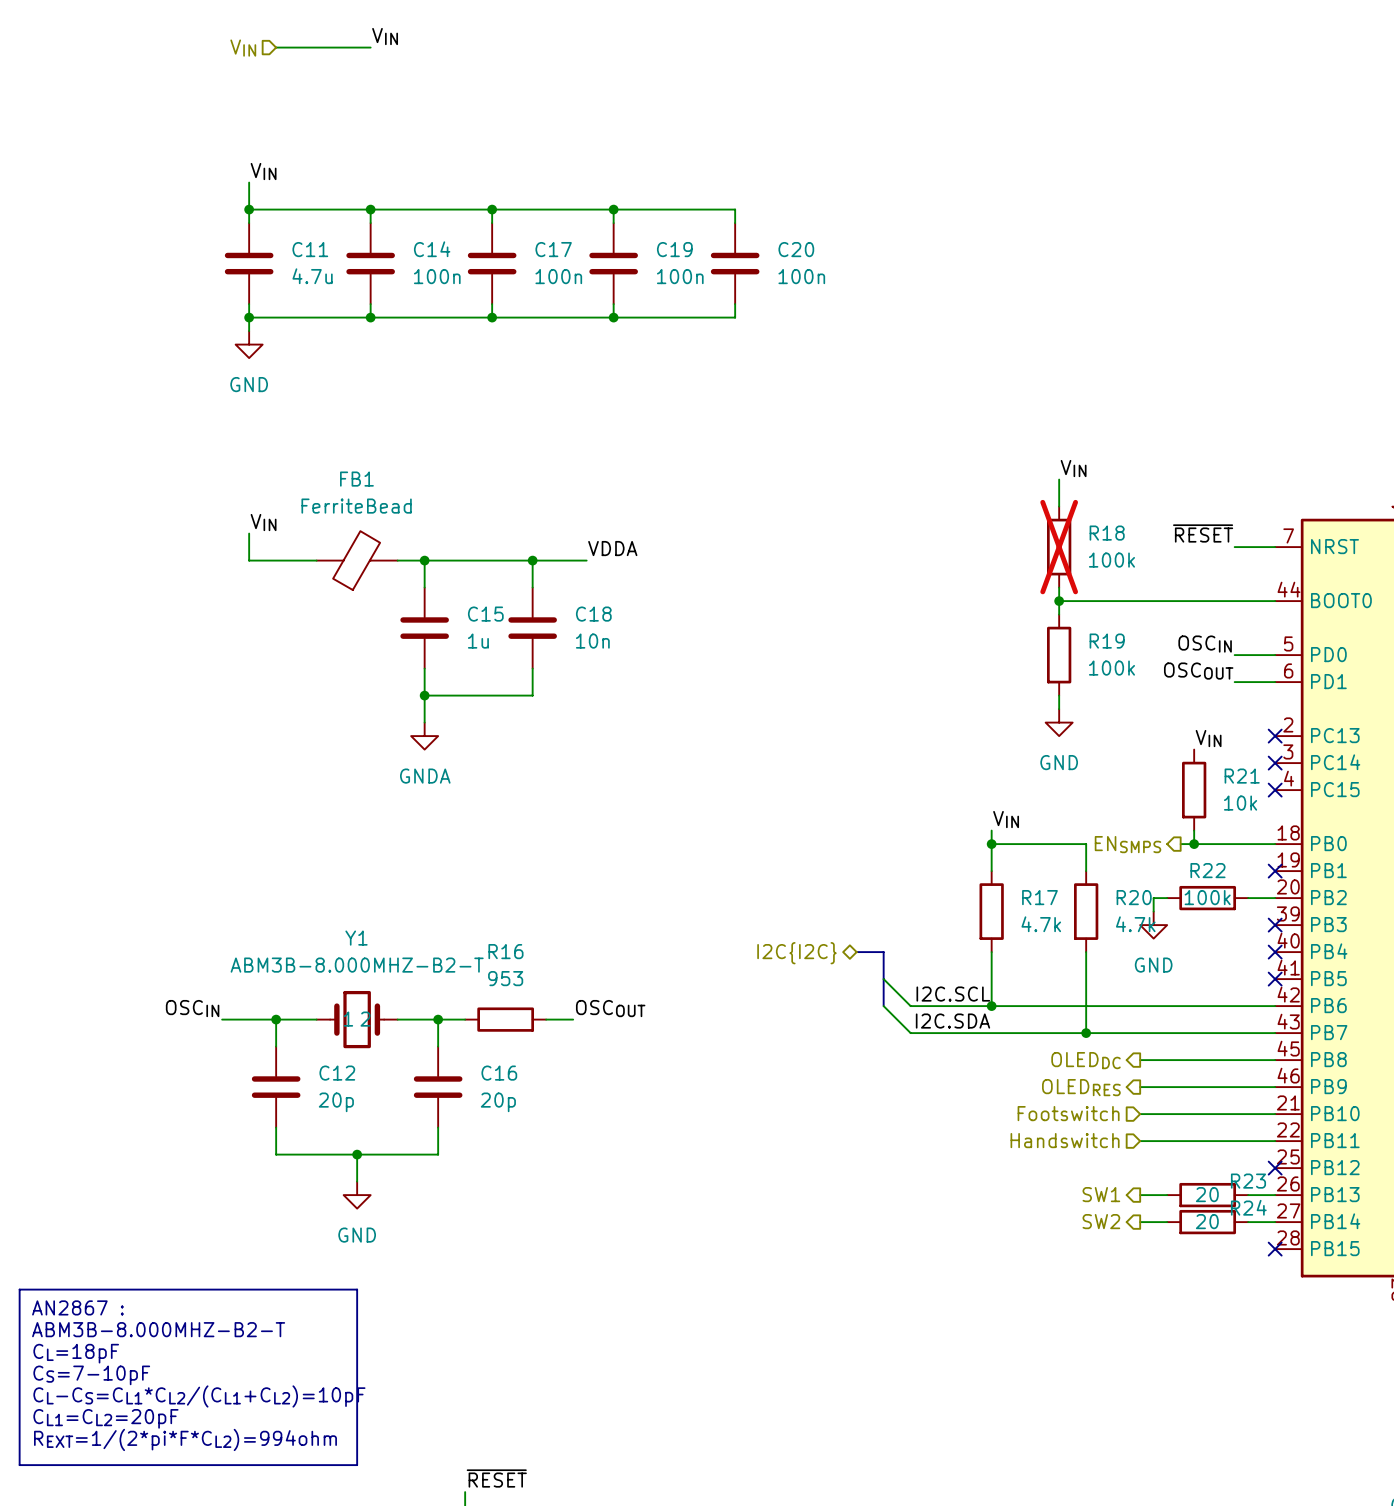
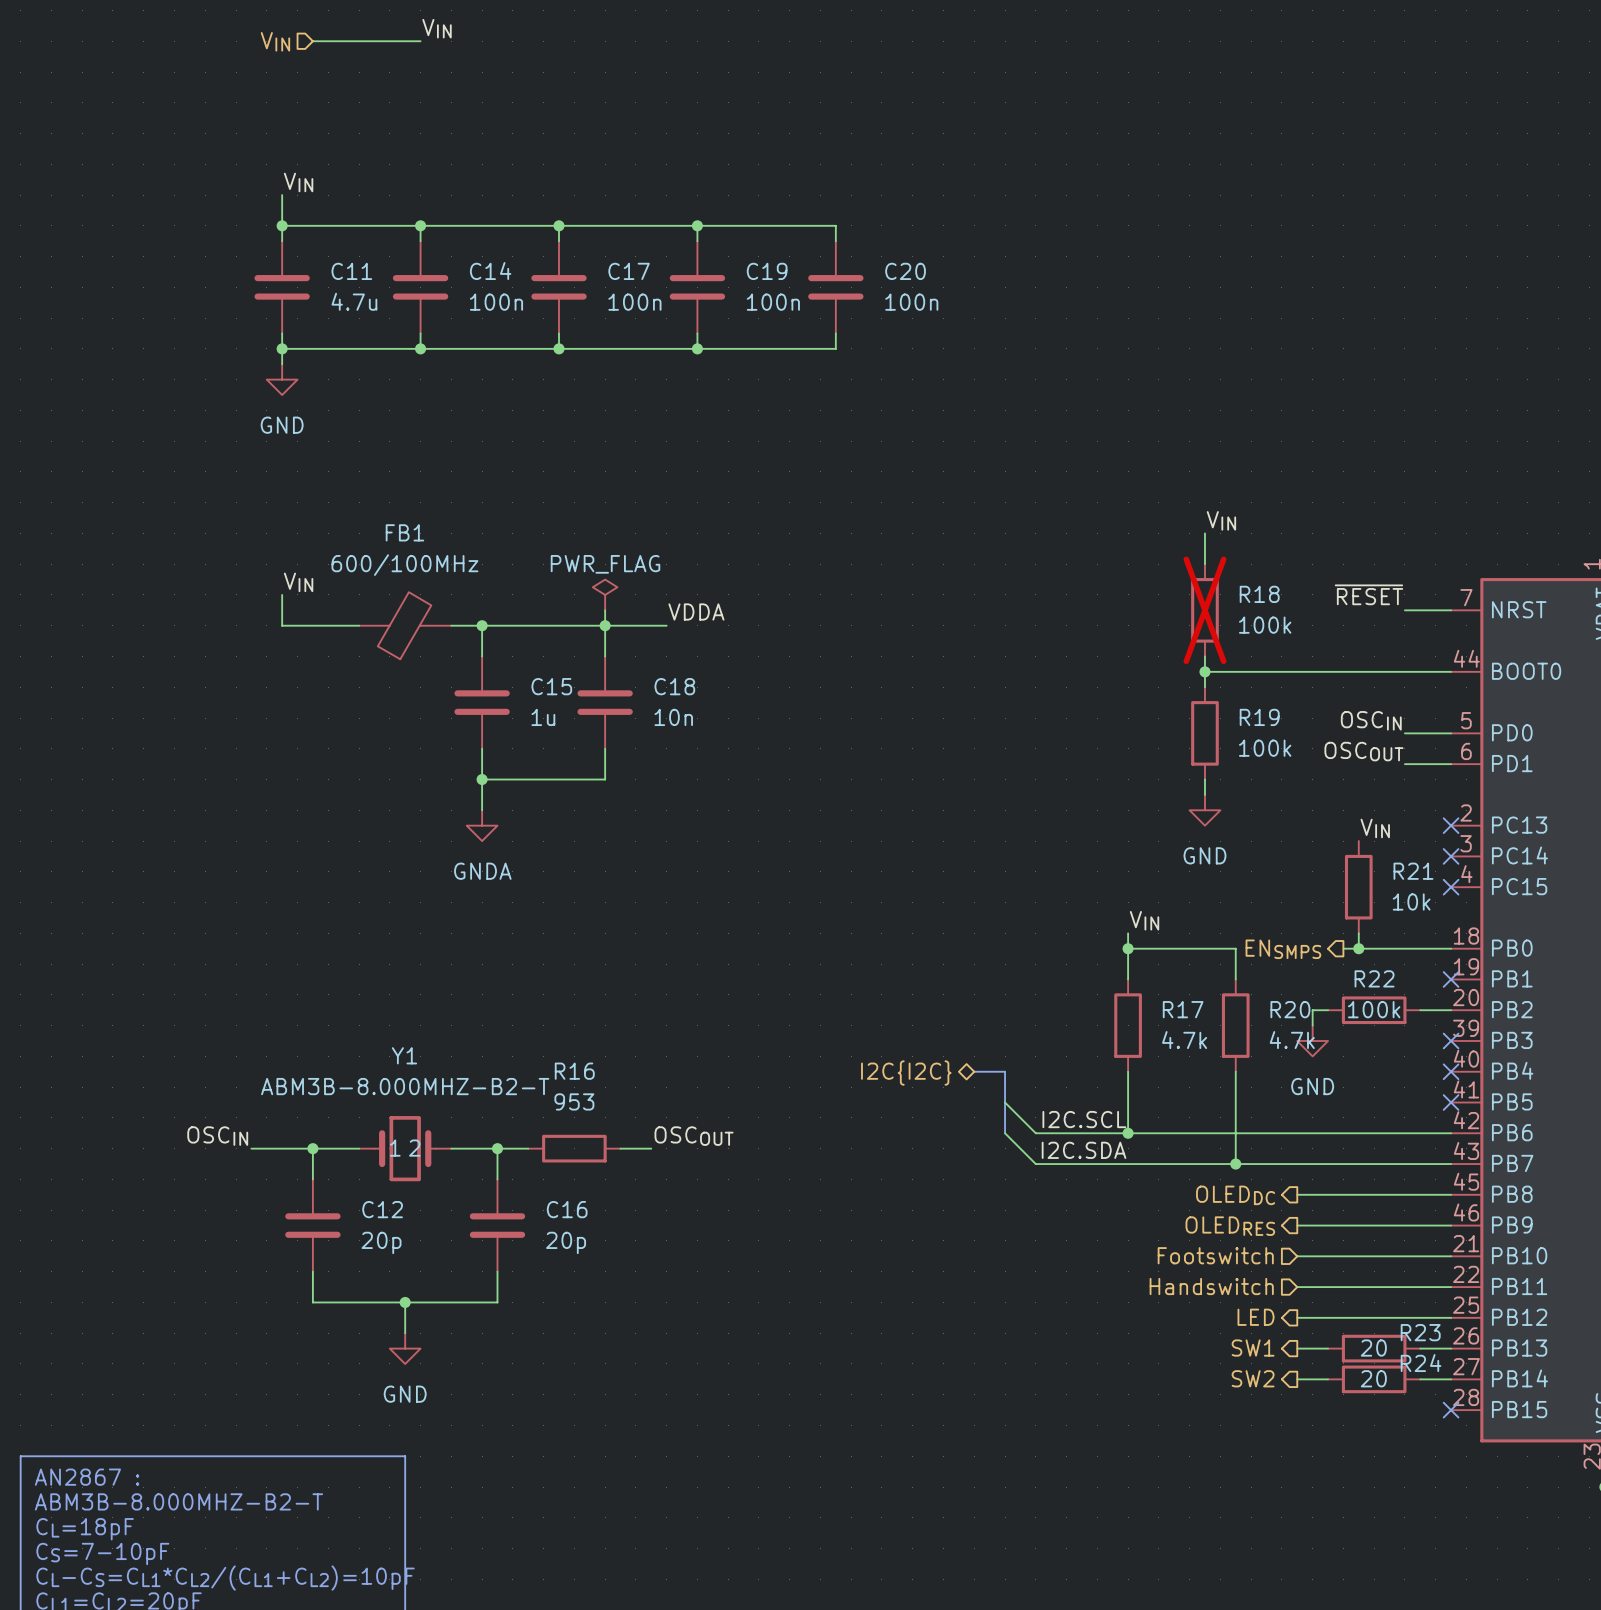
FB1 value: FerriteBead (356, 506) -> 600/100MHz (404, 565)
power symbol: none -> PWR_FLAG (605, 594)
wire: none -> (605, 610) (605, 625)
hierarchical label: none -> LED (1256, 1317)
wire: none -> (1297, 1317) (1451, 1317)
no-connect mark: (1275, 1168) -> none

